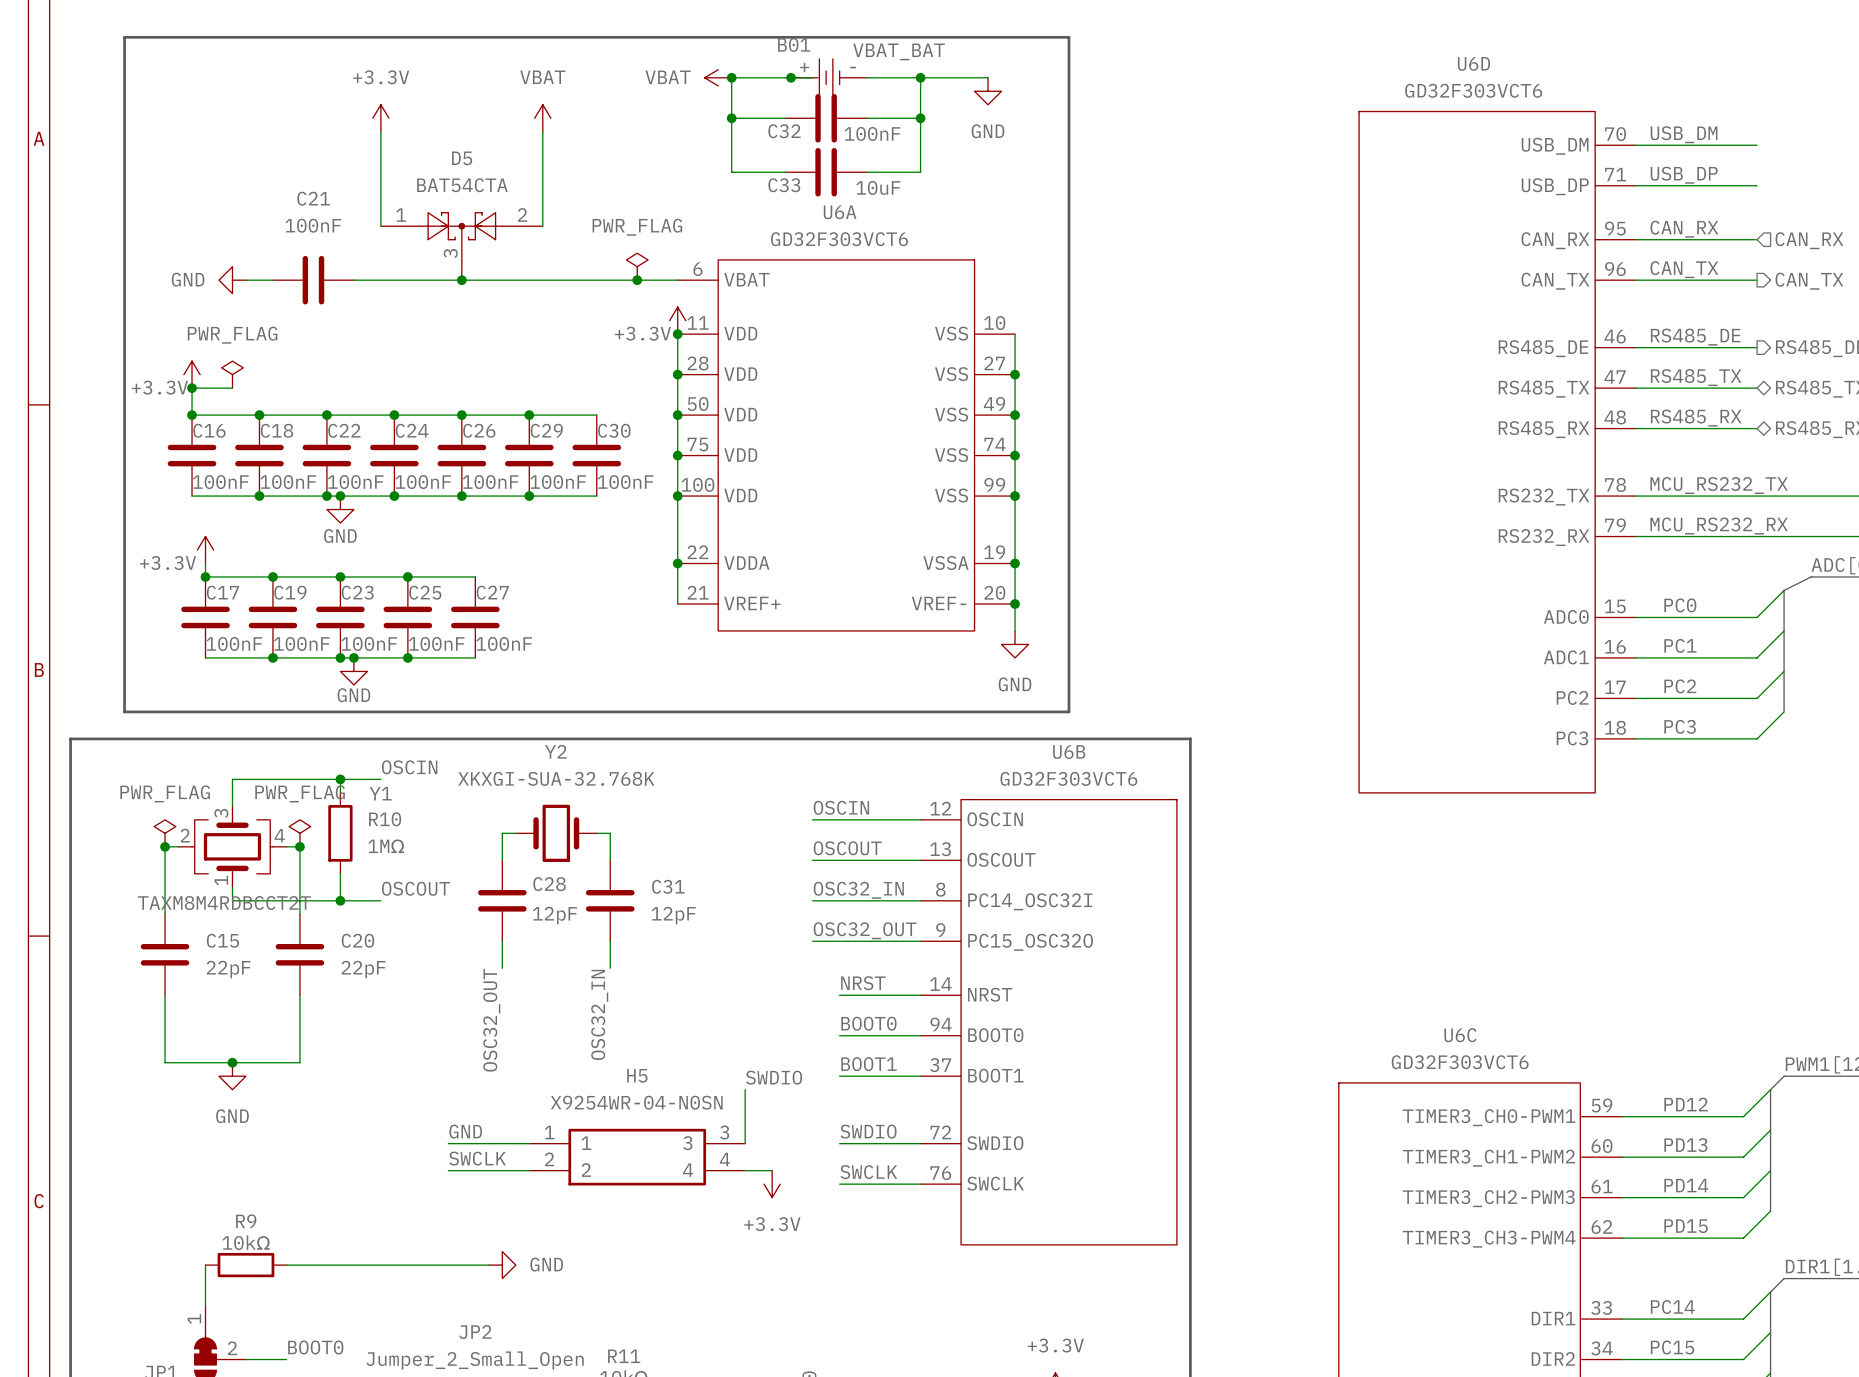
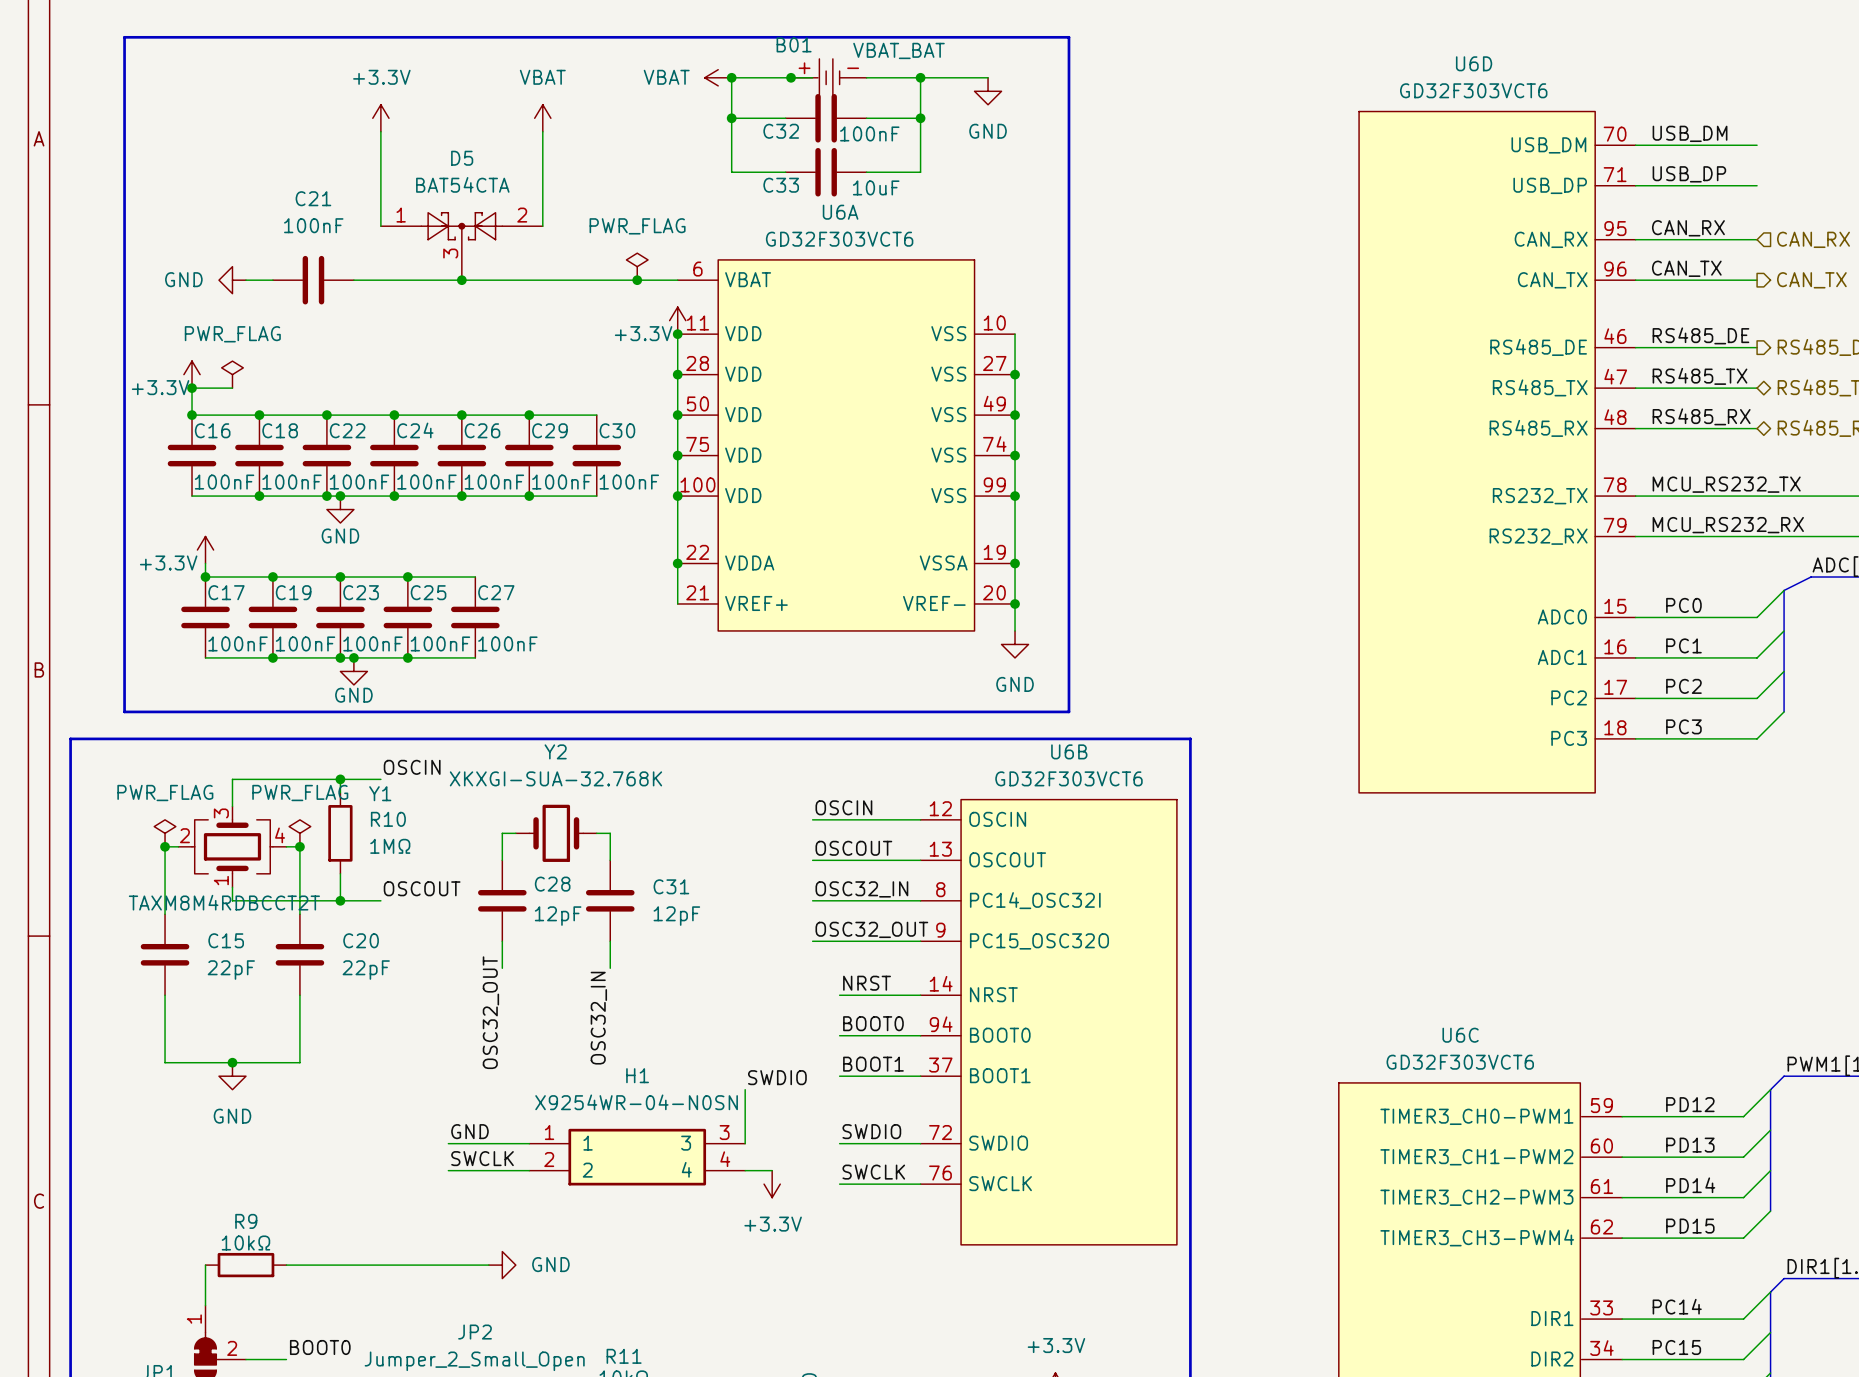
label position: OSC32_OUT (491, 1020) -> OSC32_OUT (490, 1012)
H5 name: H5 (637, 1075) -> H1 (637, 1075)

